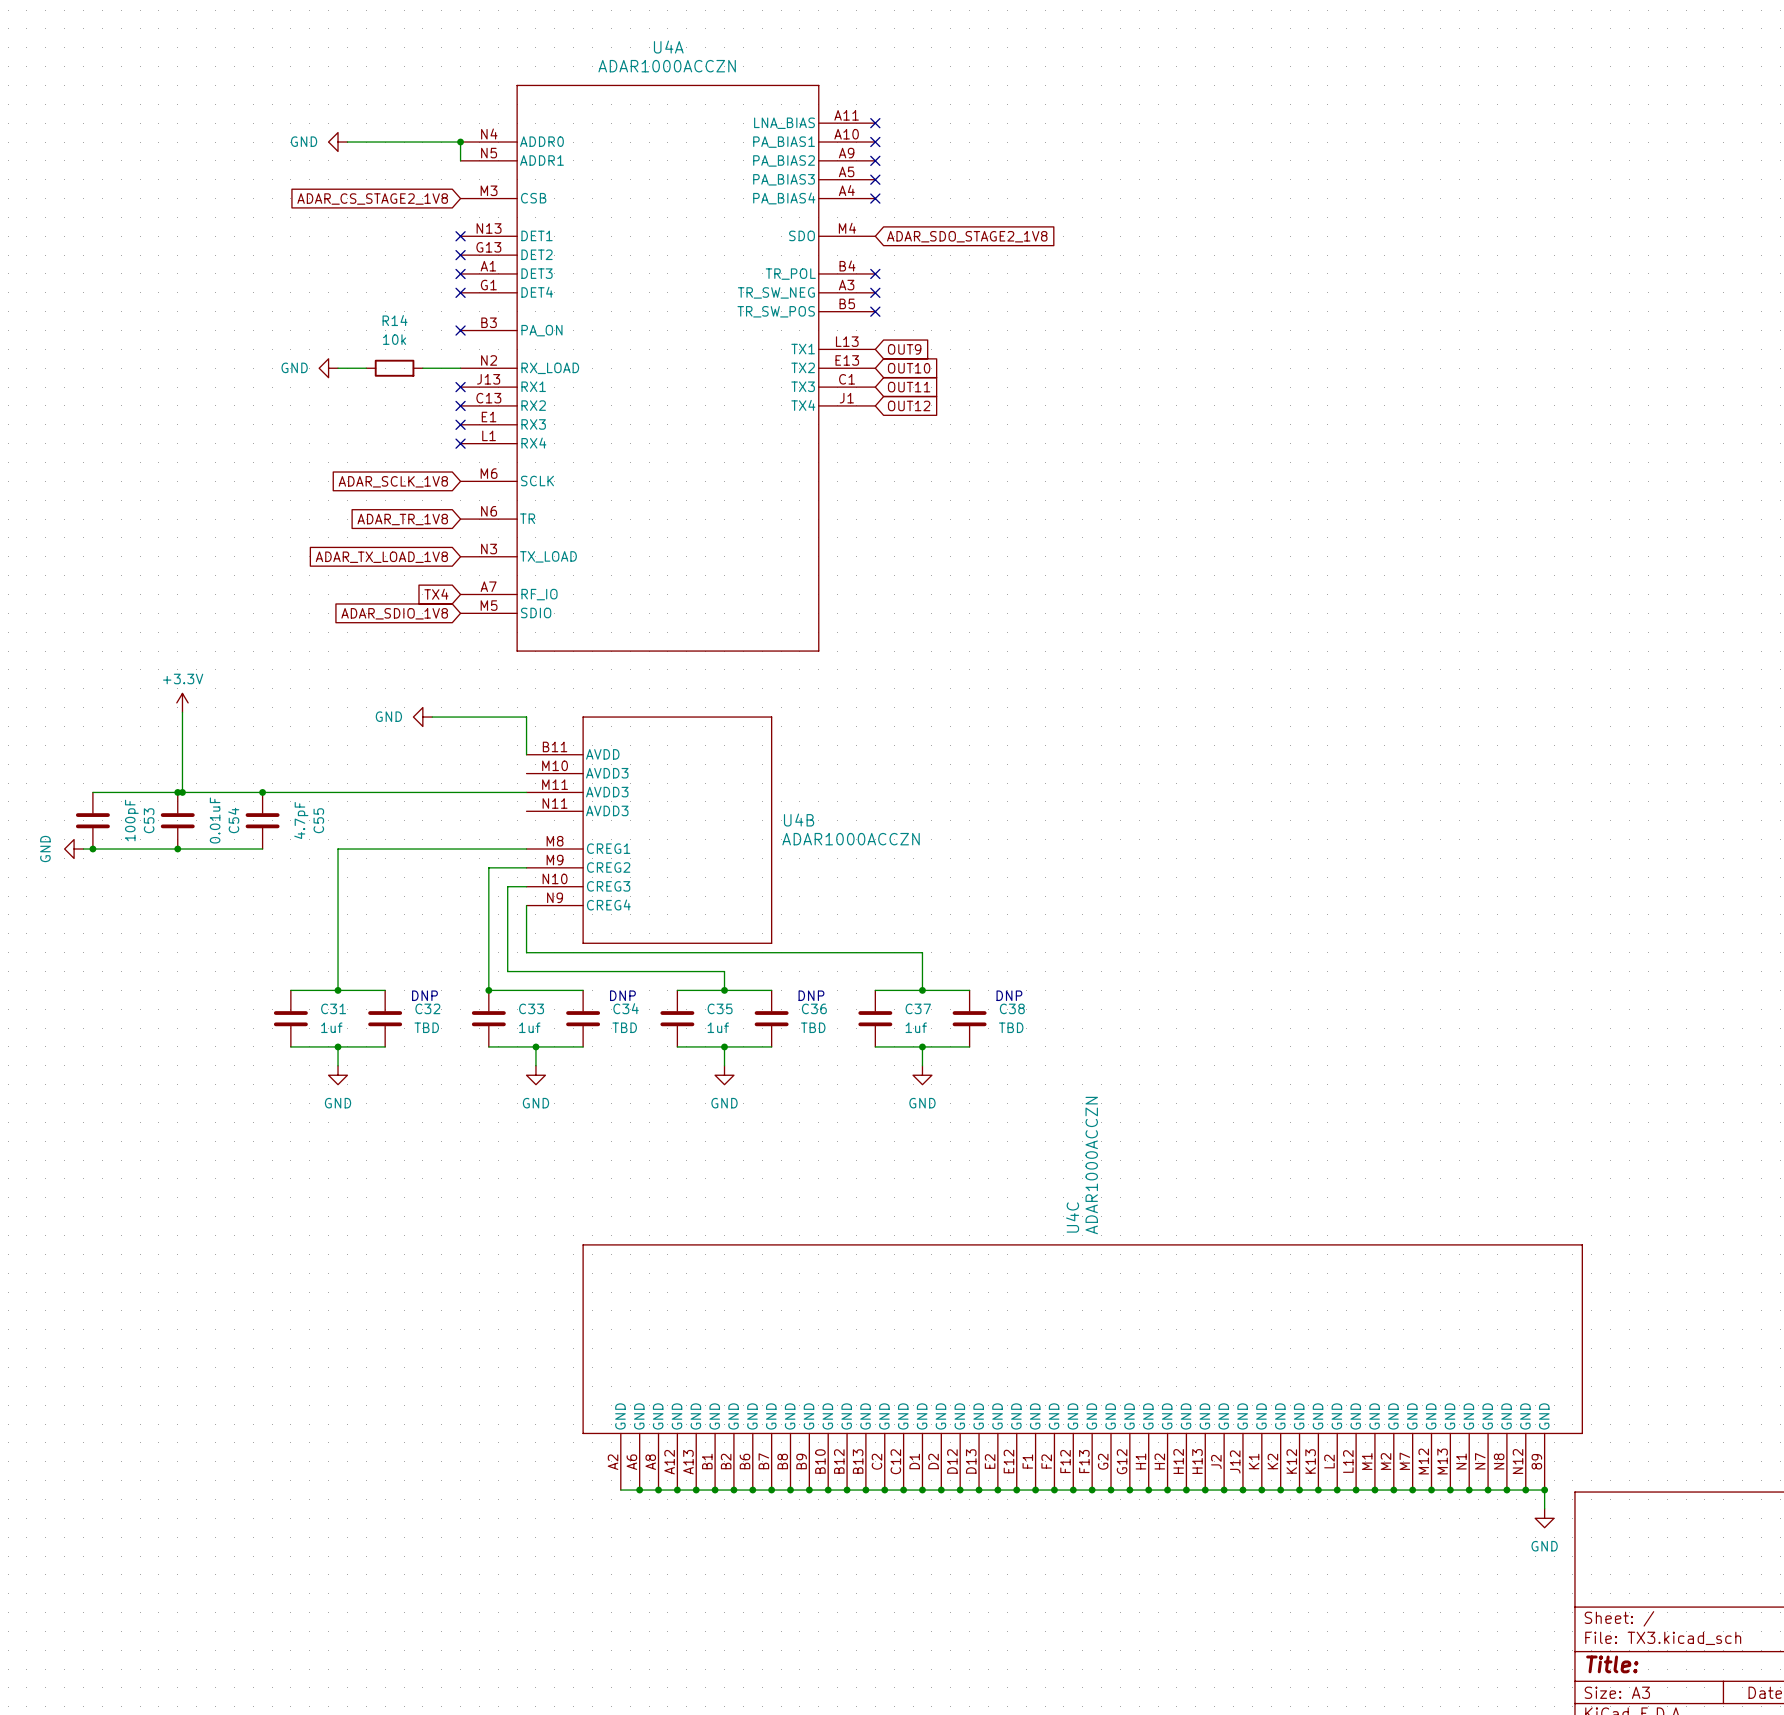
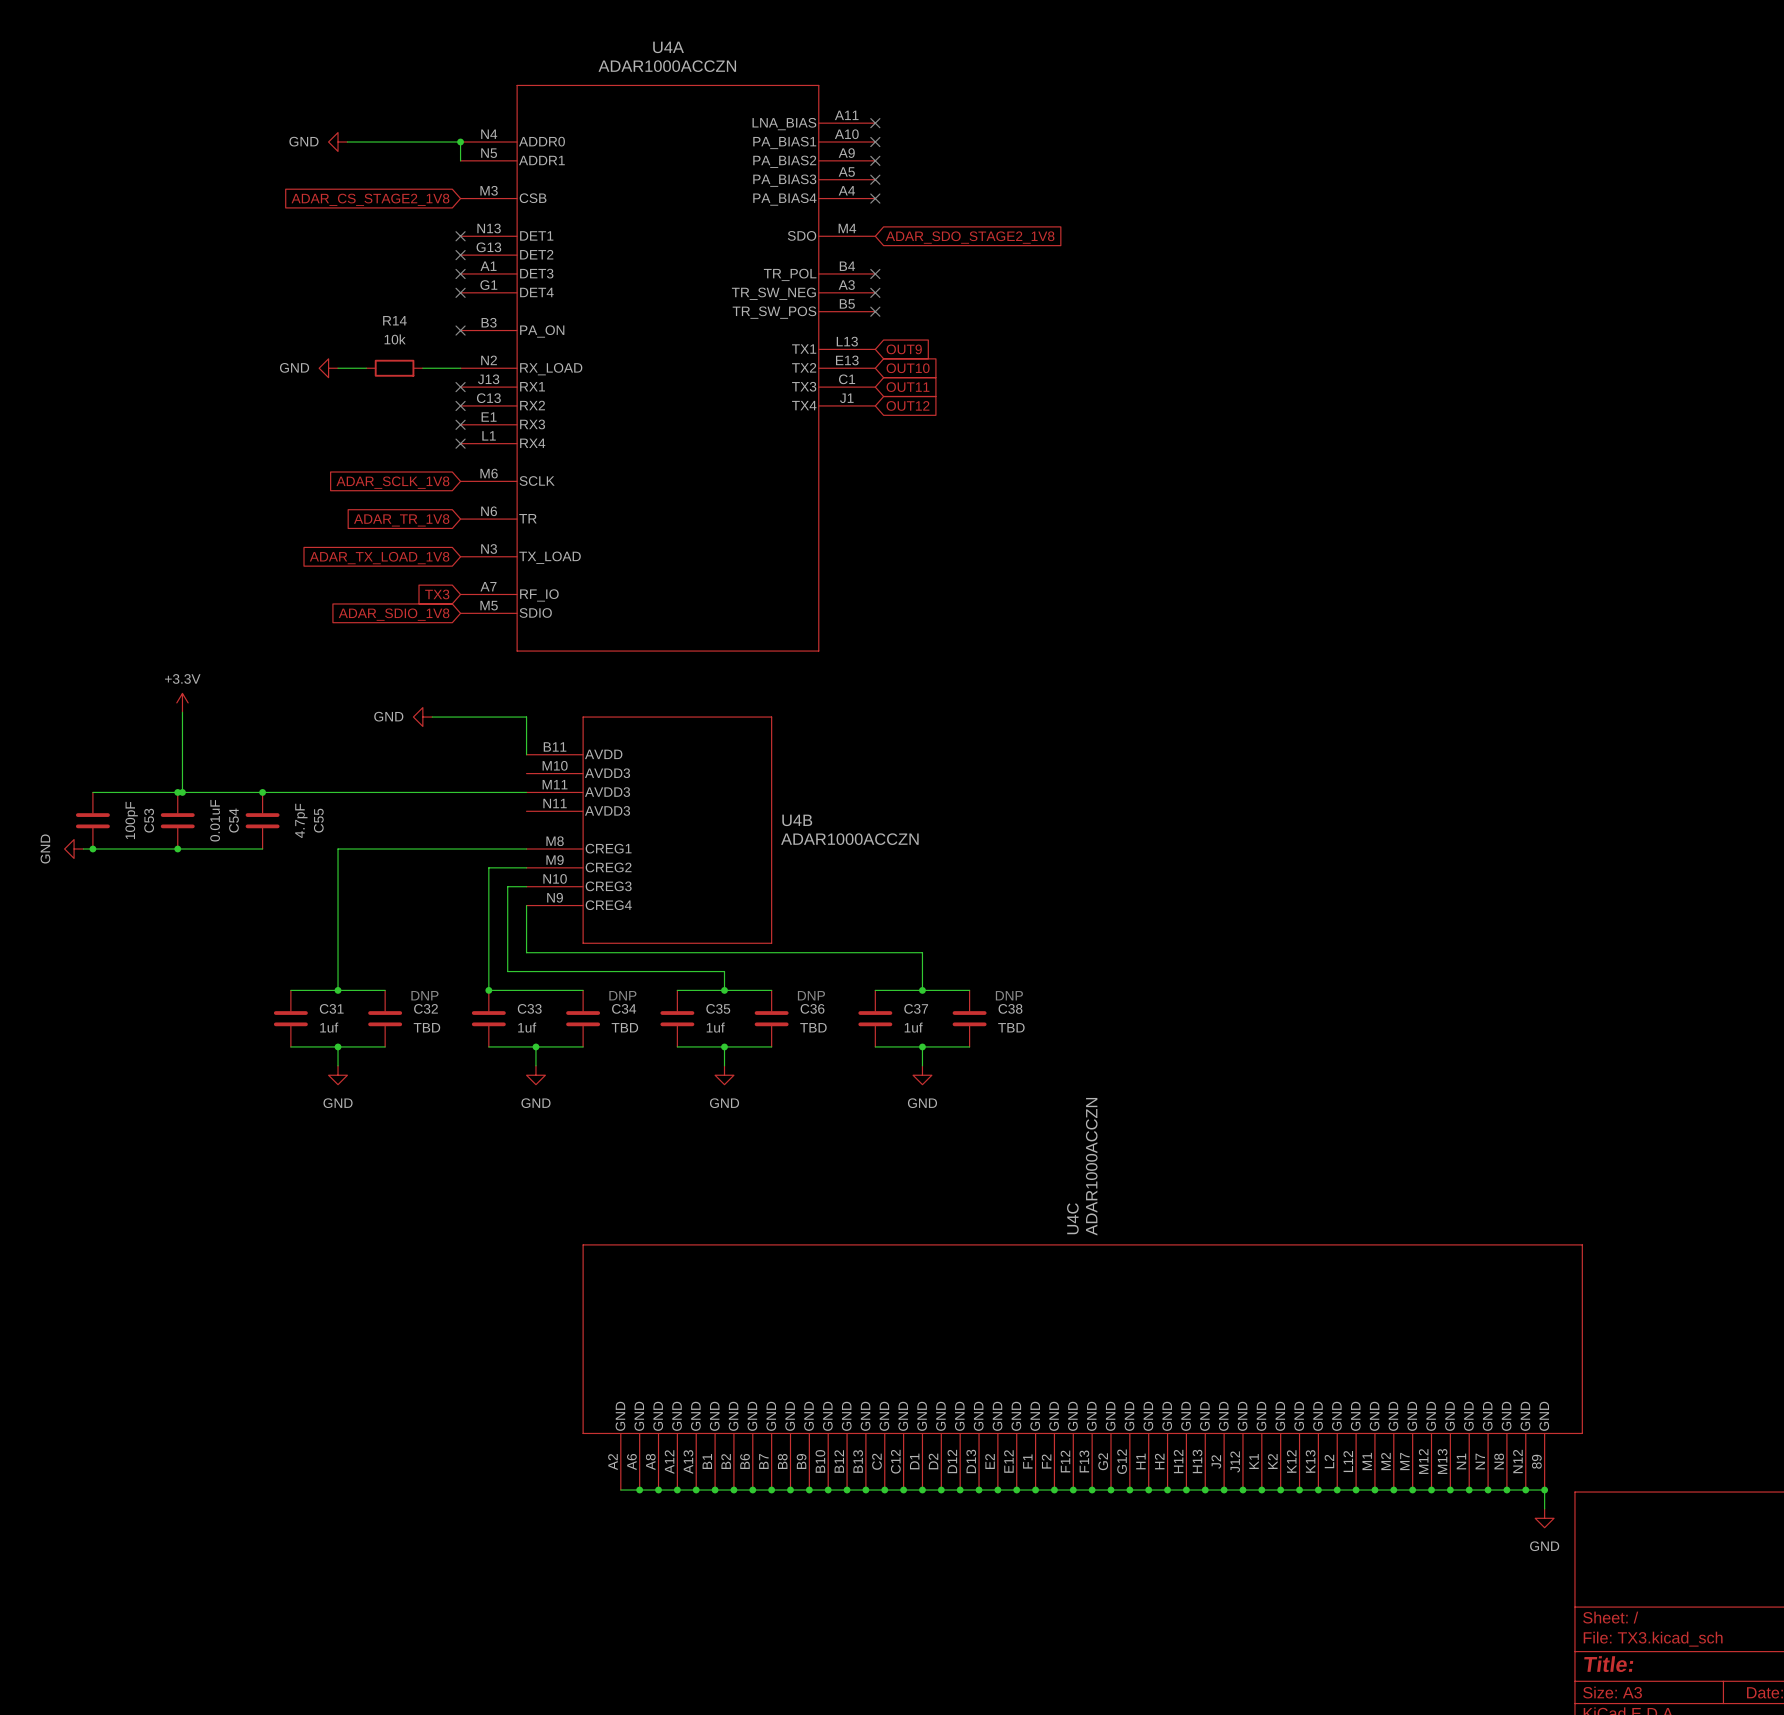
global label: TX4 (436, 594) -> TX3 (437, 594)

